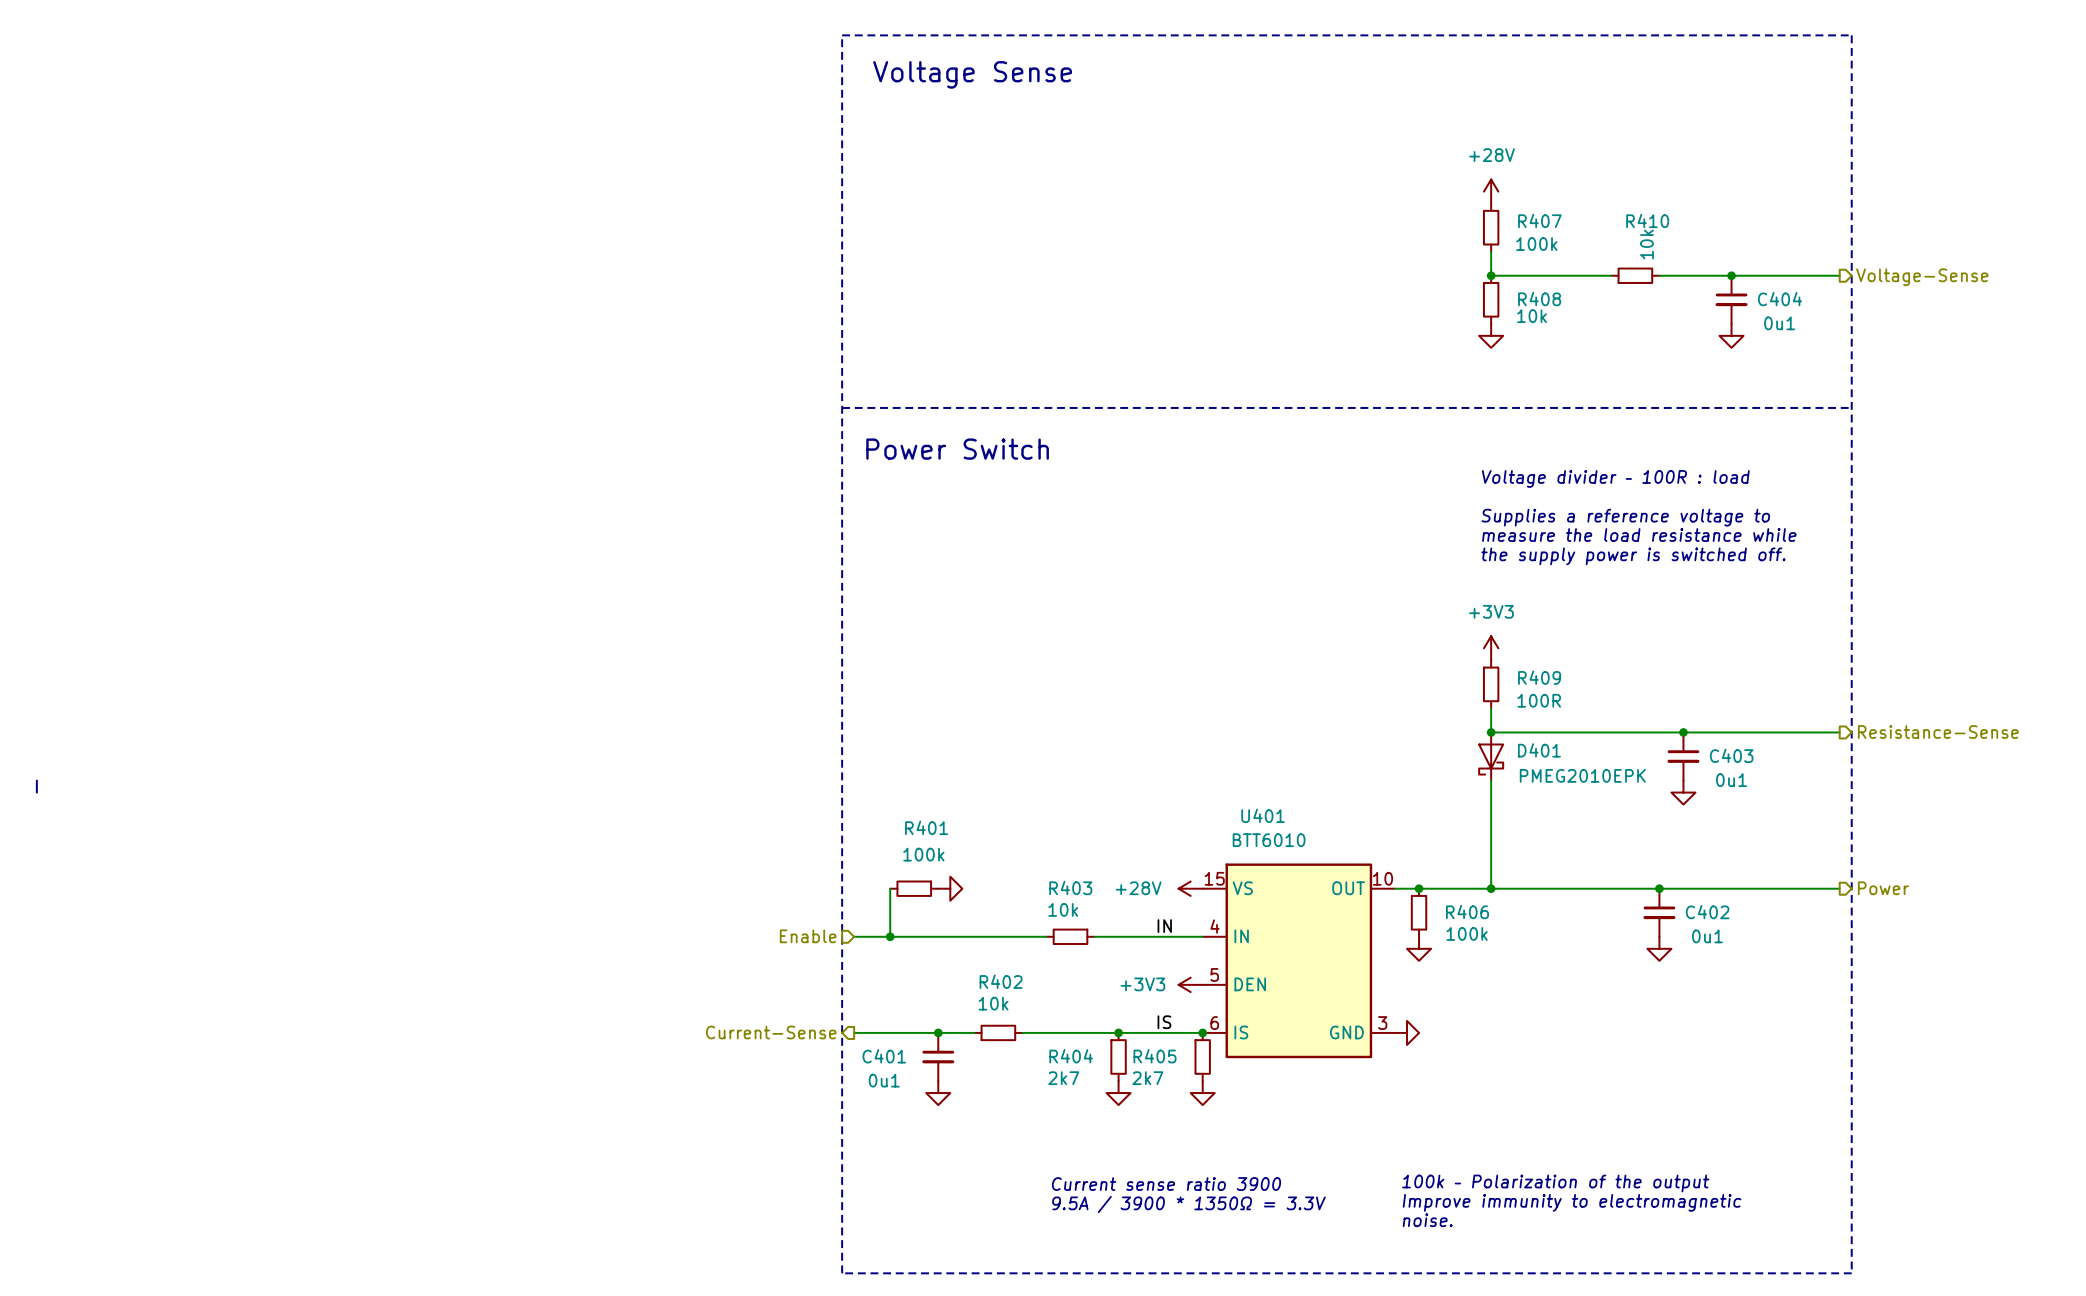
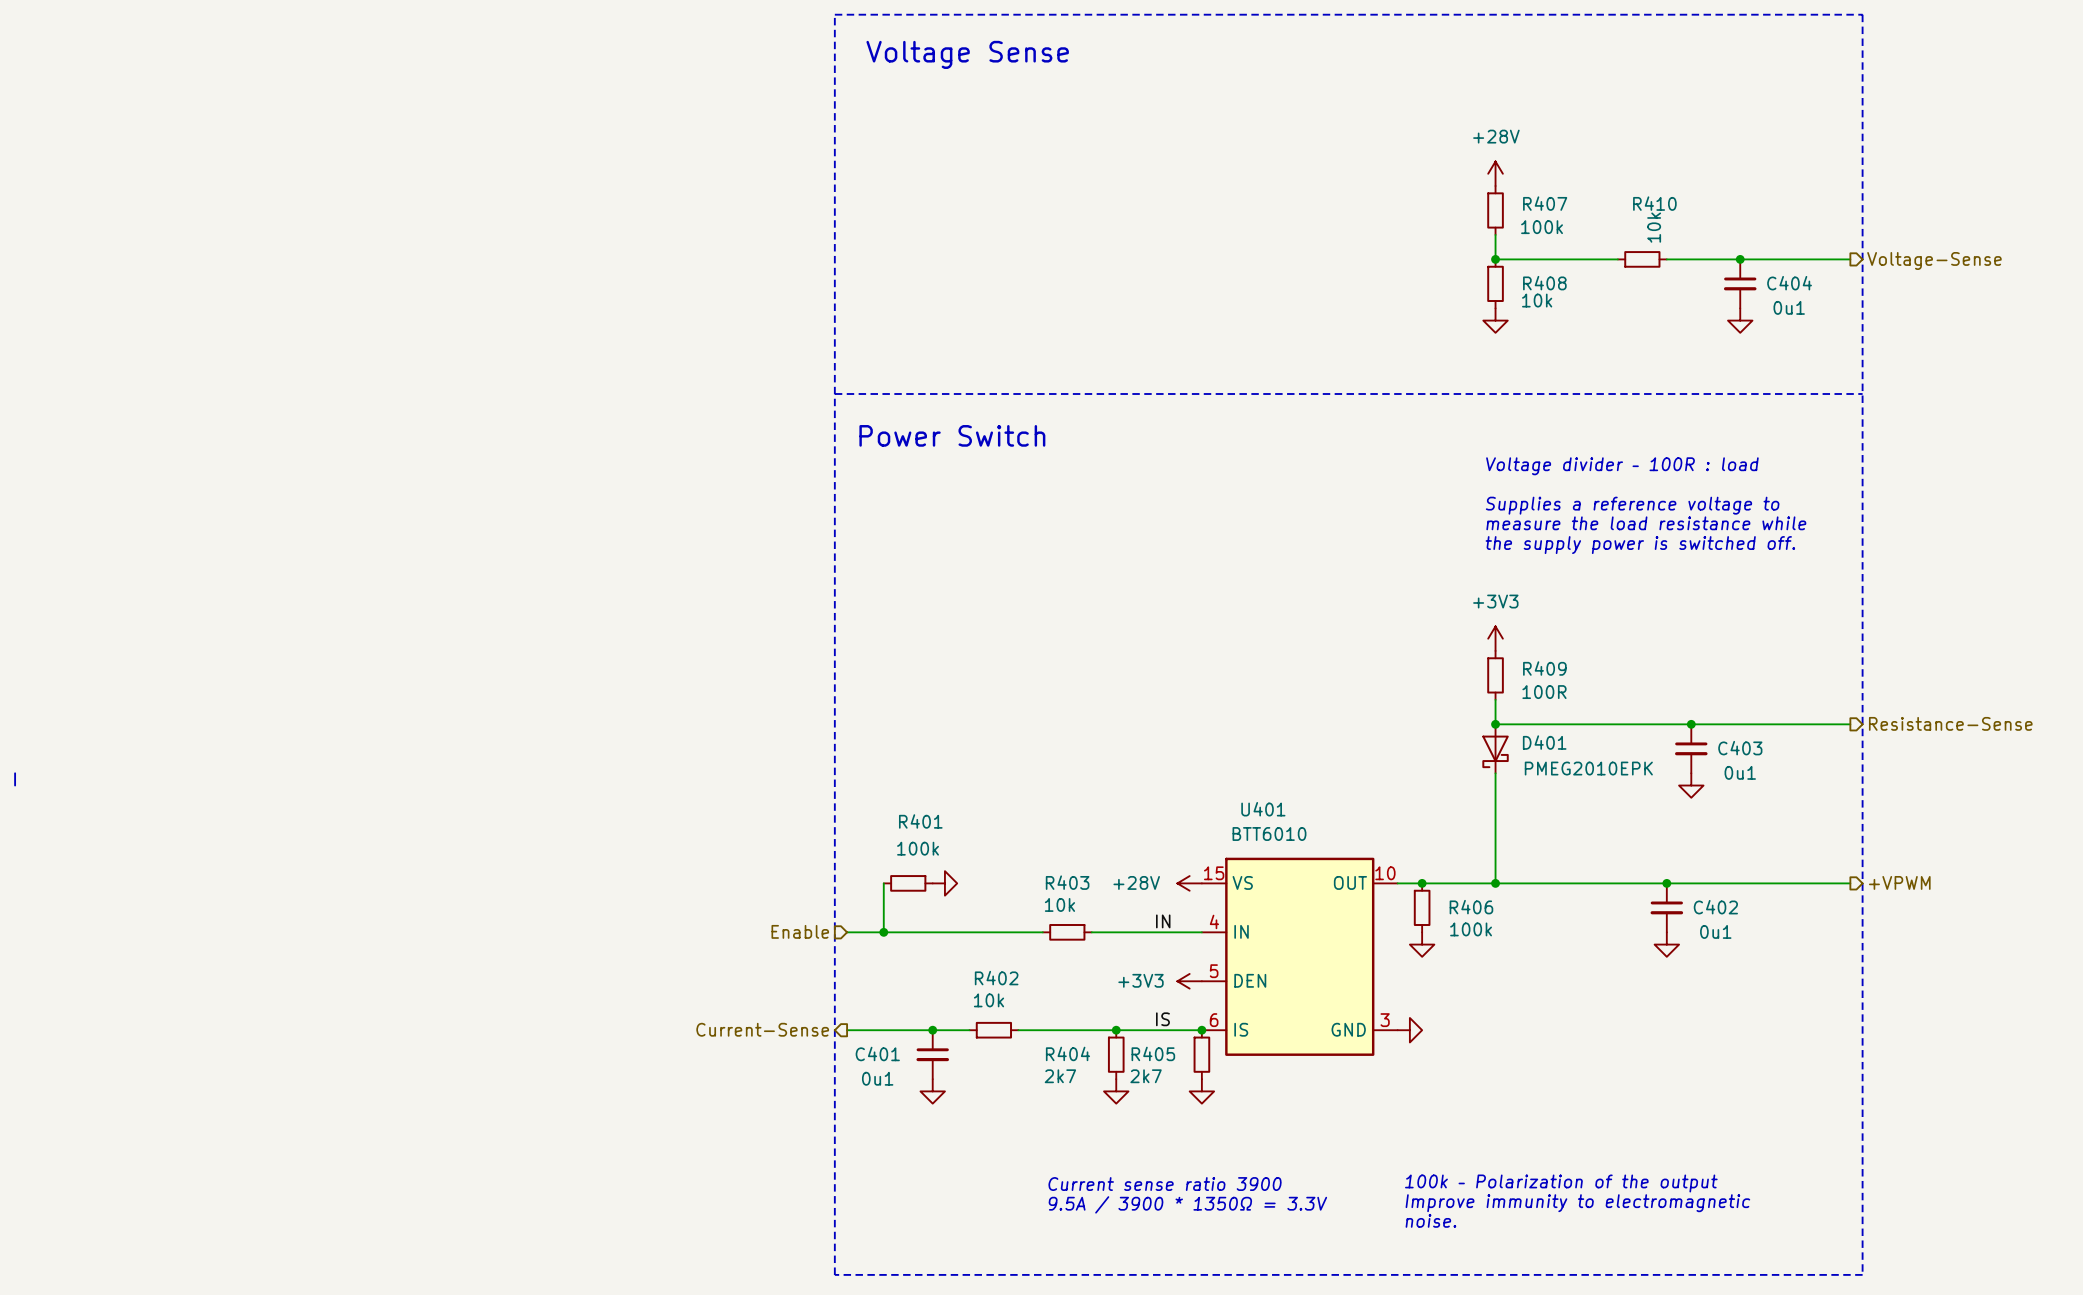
hierarchical label: Power (1883, 888) -> +VPWM (1899, 882)

